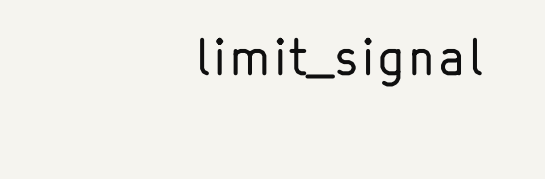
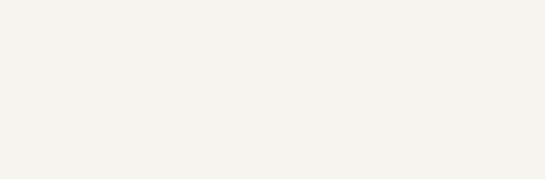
label: limit_signal (340, 62) -> none

